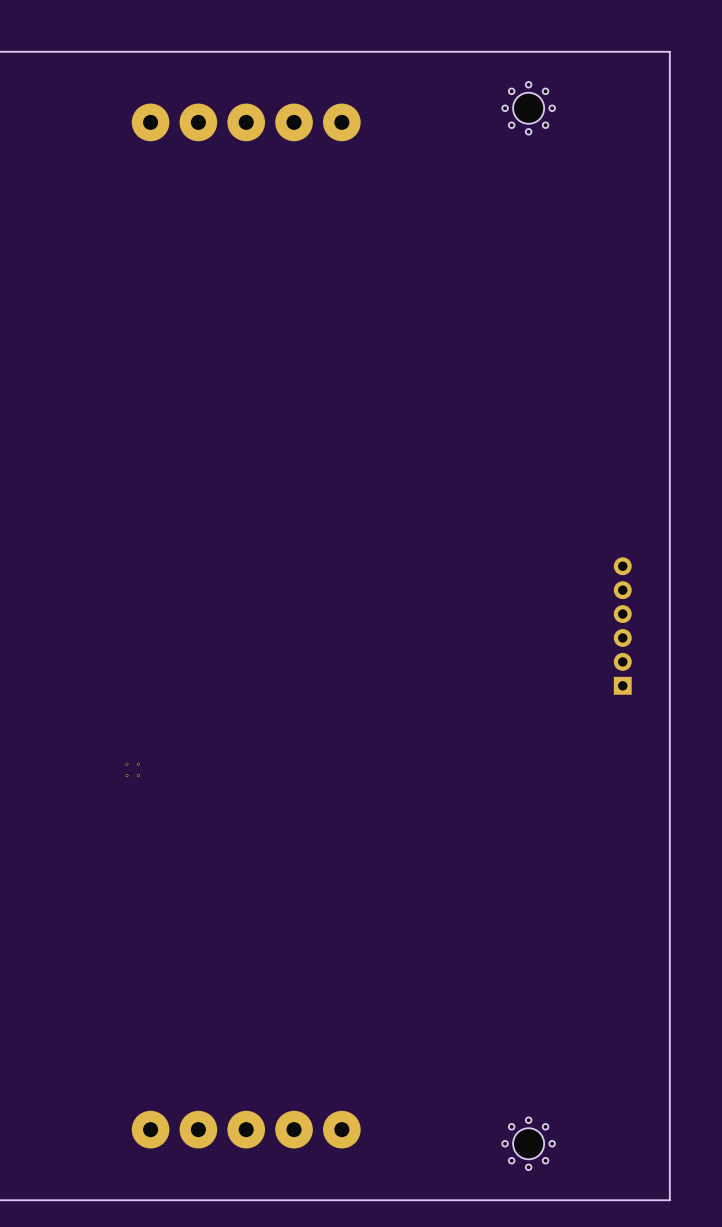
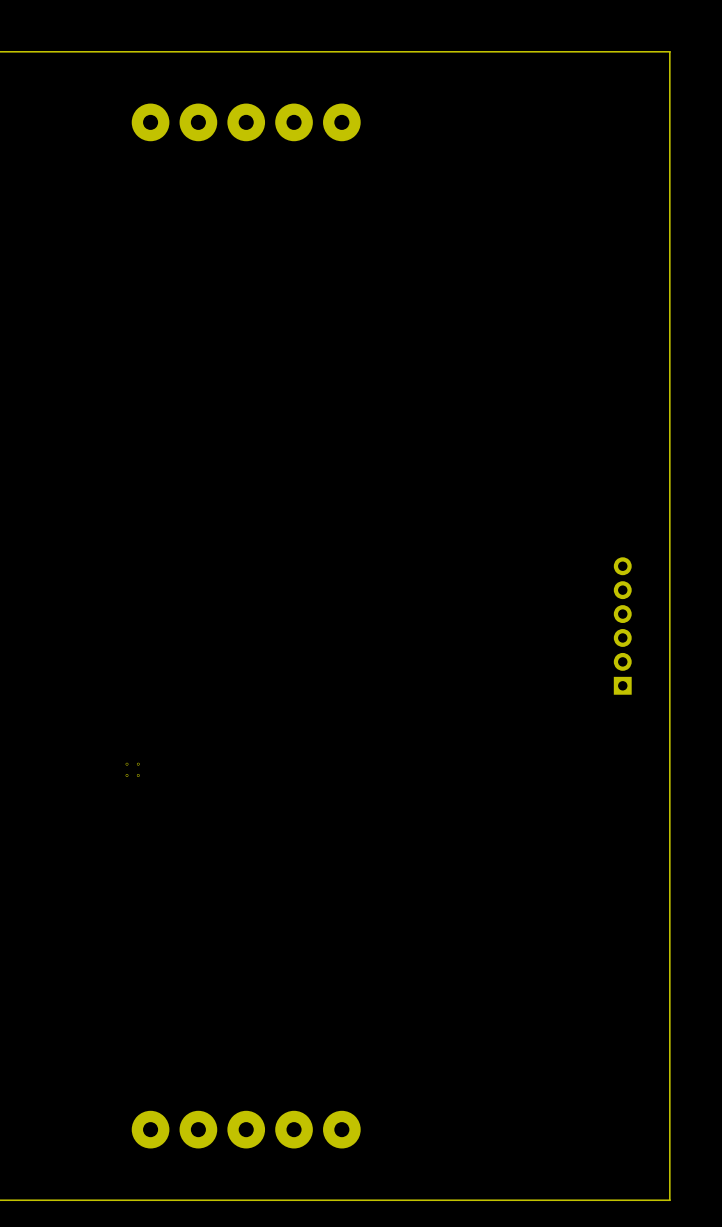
part: (528, 108) -> none
part: (528, 1143) -> none

